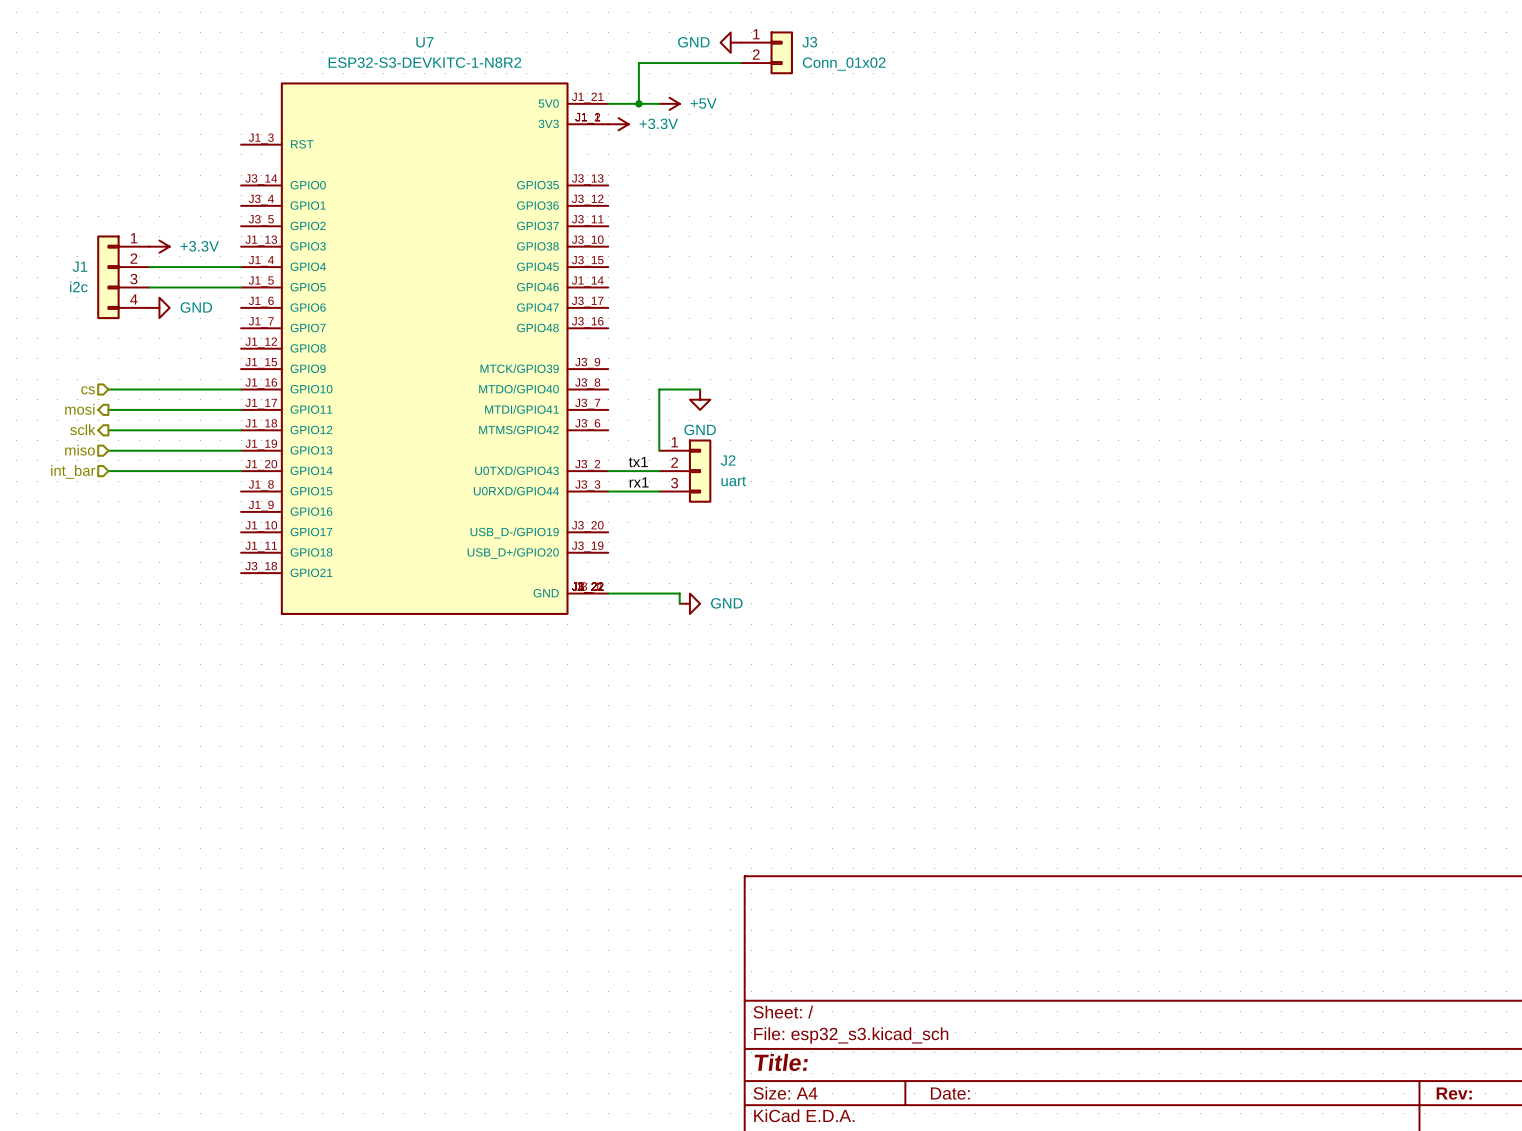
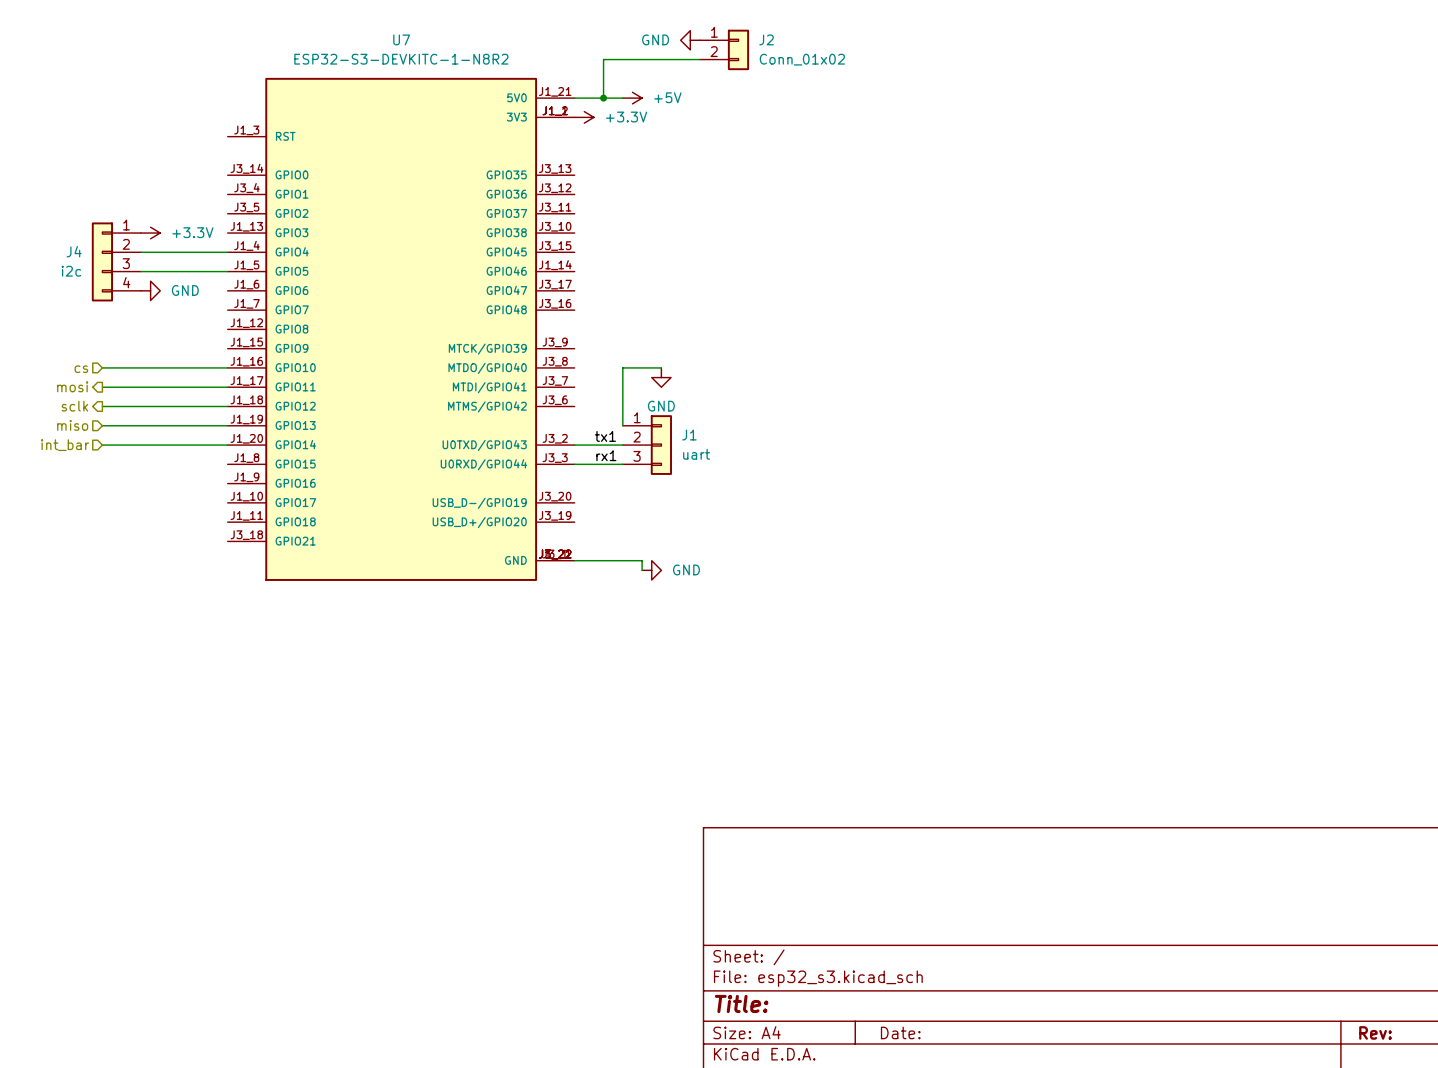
J3 name: J3 (809, 42) -> J2 (766, 39)
J1 name: J1 (79, 266) -> J4 (74, 251)
J2 name: J2 (728, 460) -> J1 (689, 435)

